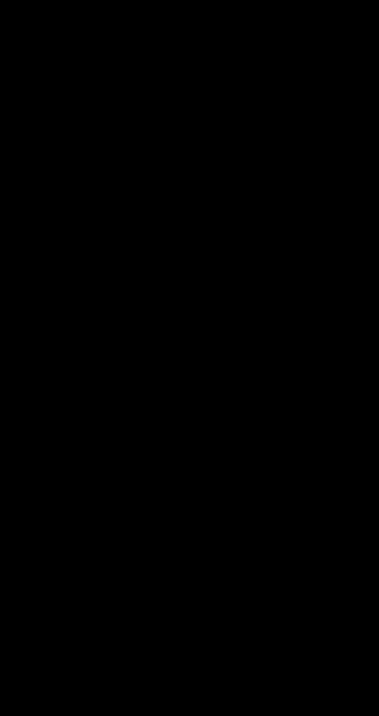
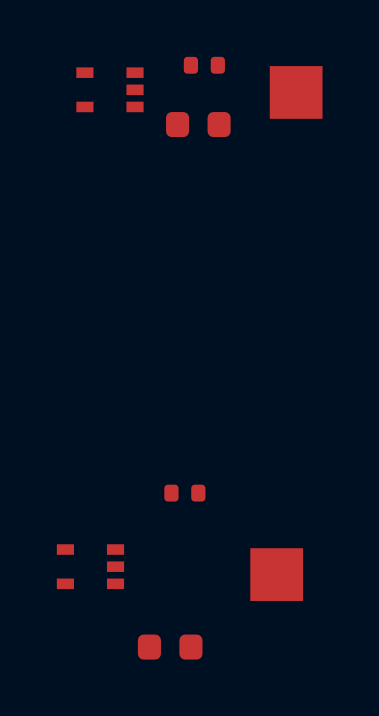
part: none -> (204, 65)
part: none -> (109, 89)
part: none -> (296, 92)
part: none -> (198, 124)
part: none -> (184, 493)
part: none -> (90, 566)
part: none -> (276, 574)
part: none -> (170, 647)

